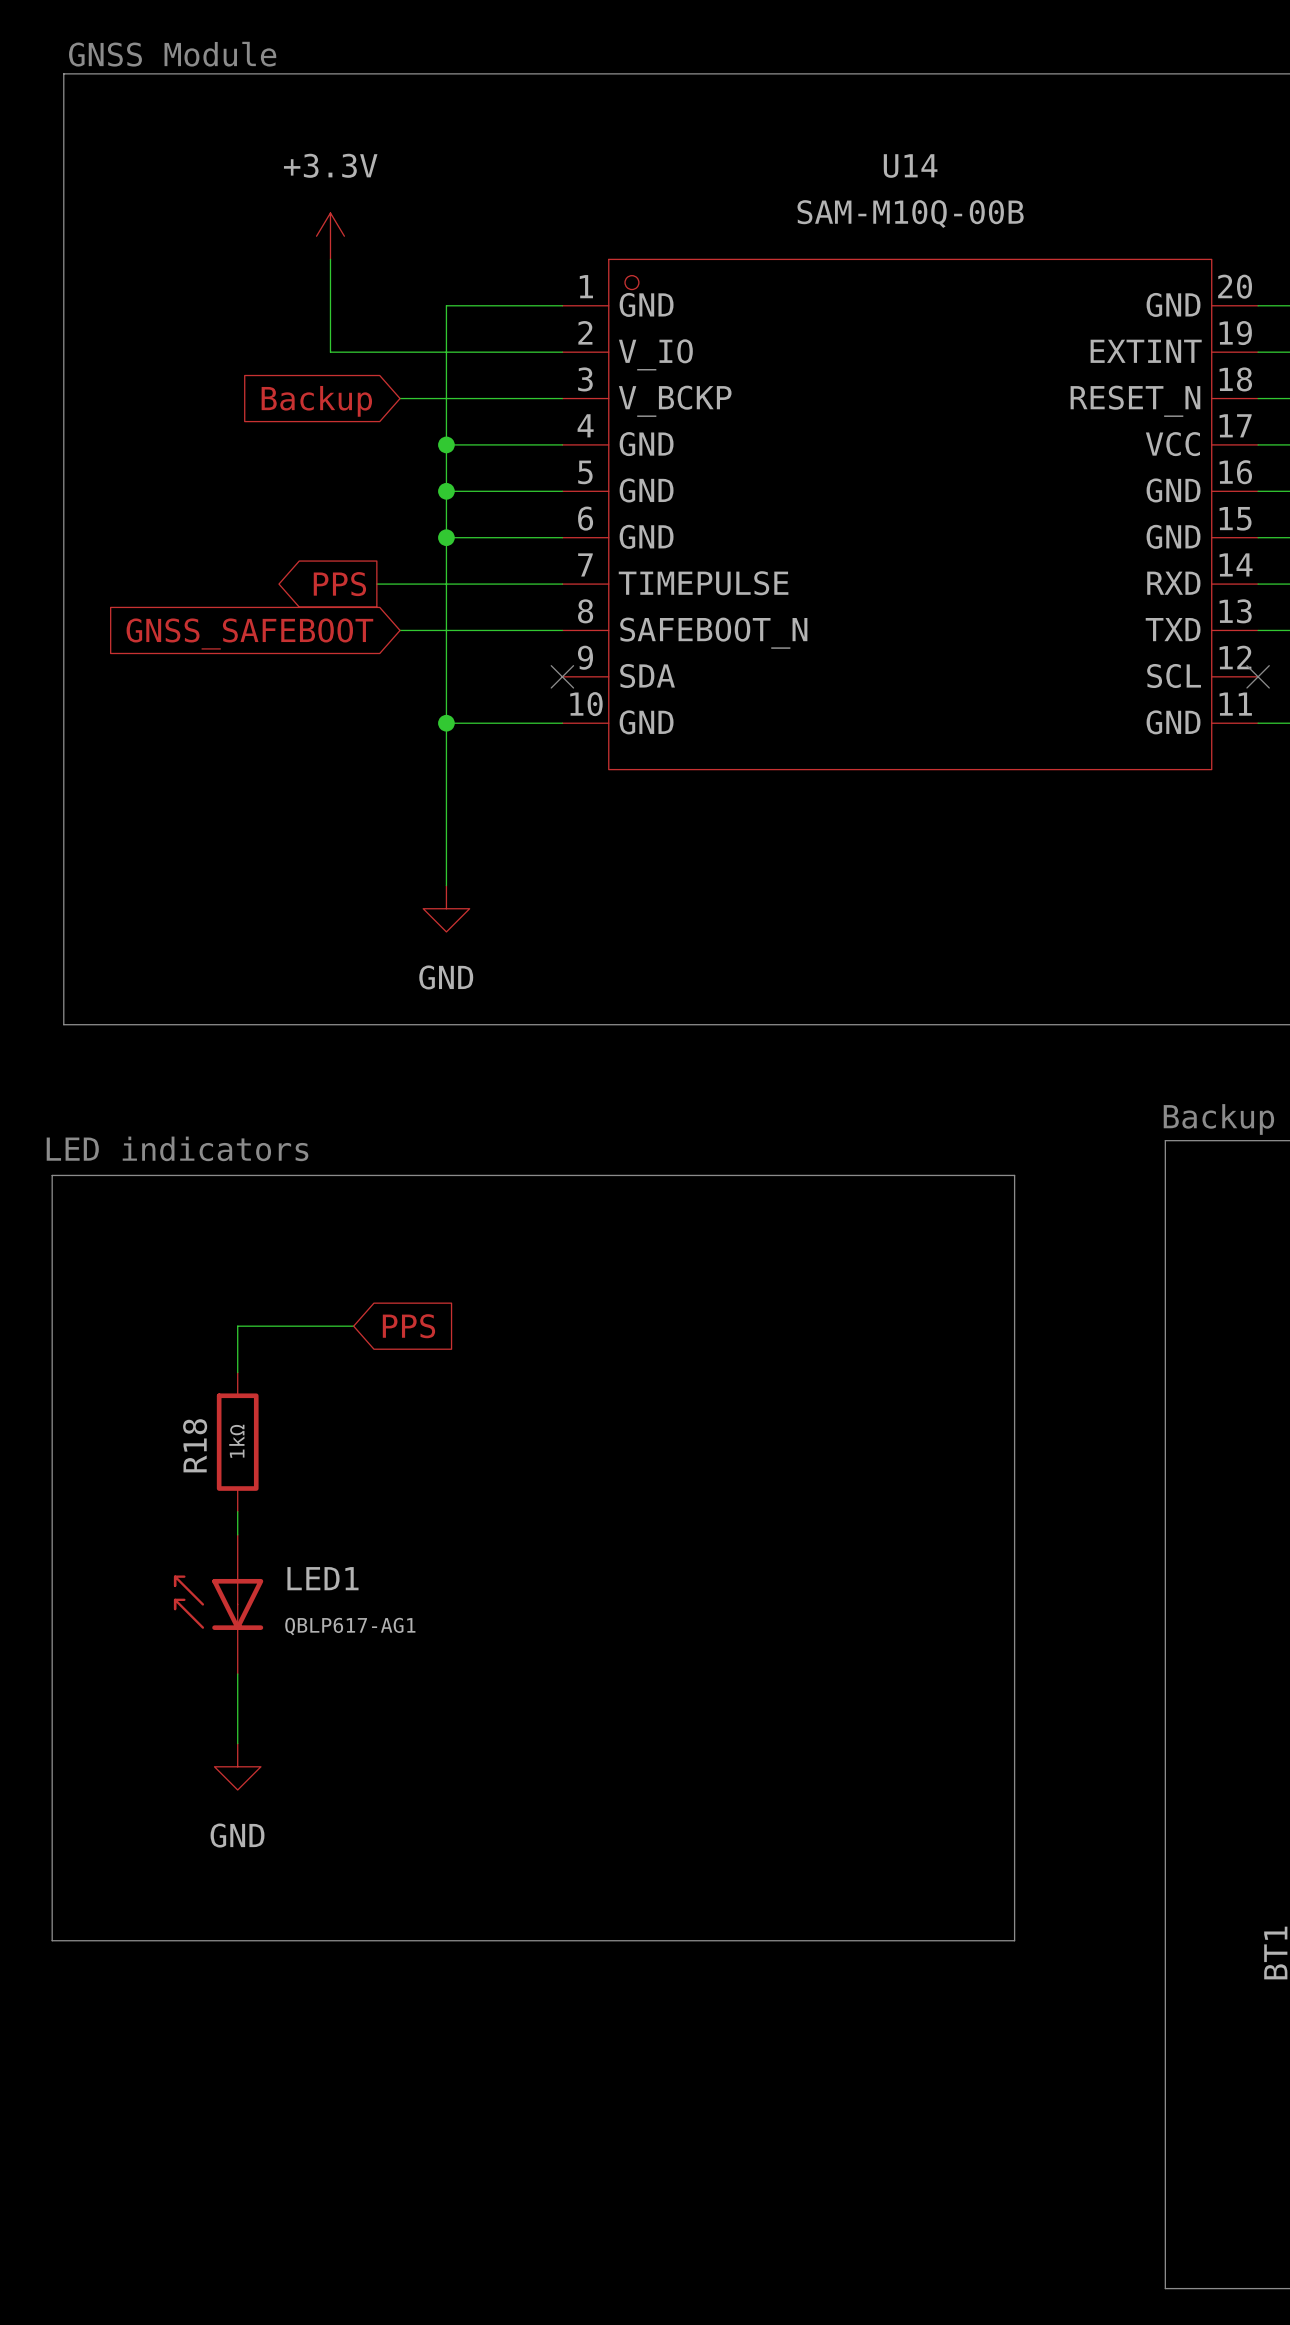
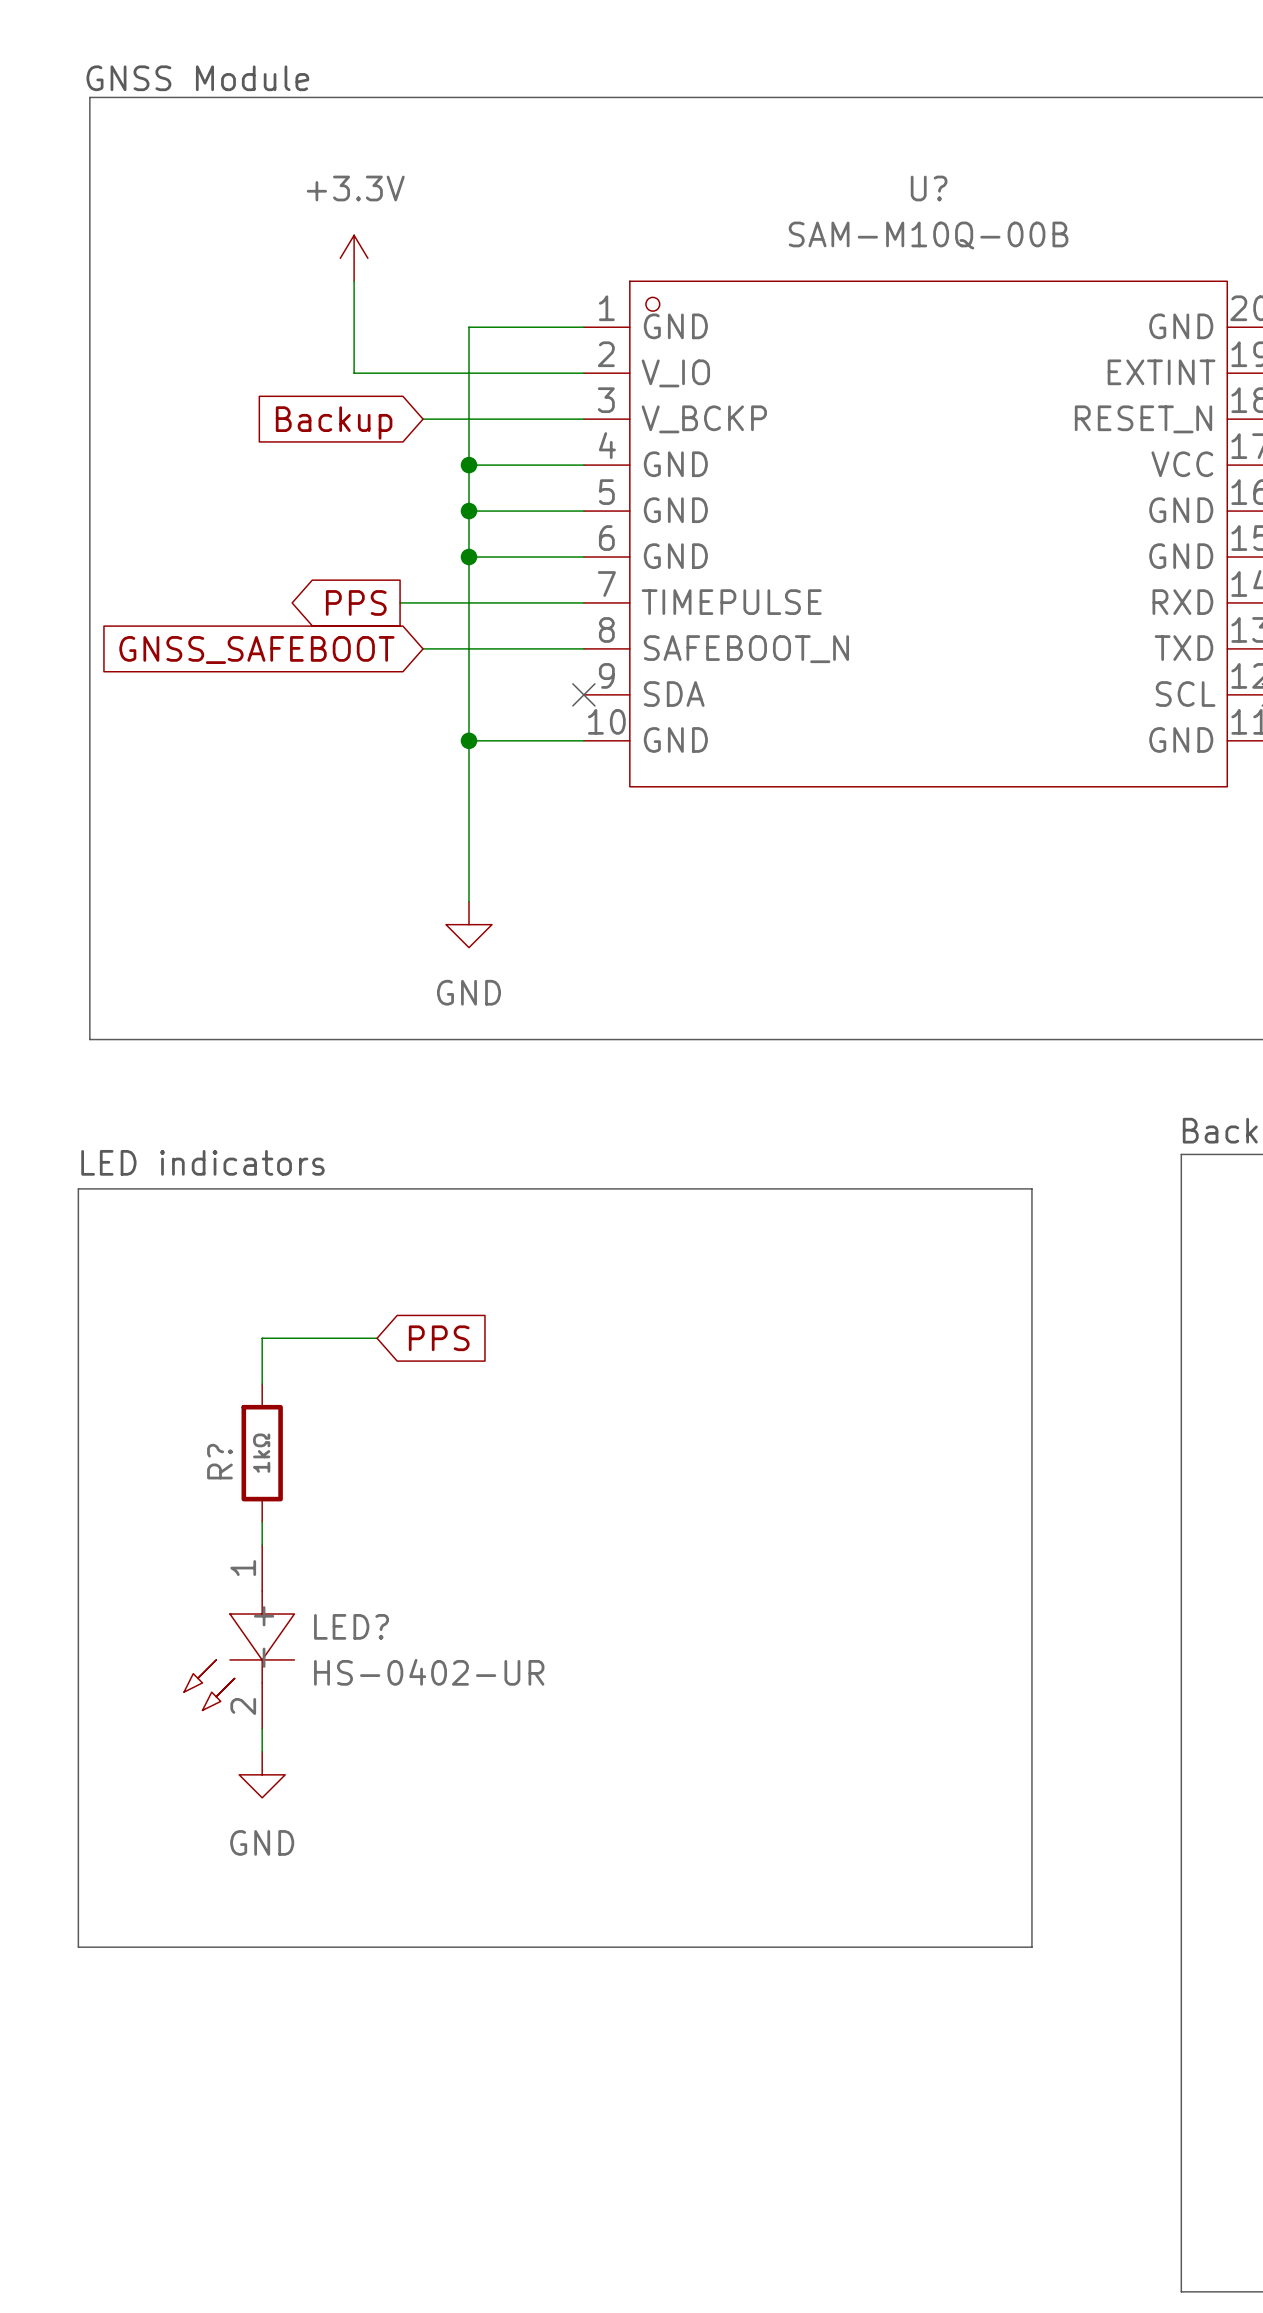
U14 name: U14 (910, 166) -> U? (929, 188)
R18 name: R18 (195, 1445) -> R? (219, 1461)
LED1: QBLP617-AG1 (218, 1604) -> none
LED?: none -> HS-0402-UR (239, 1636)

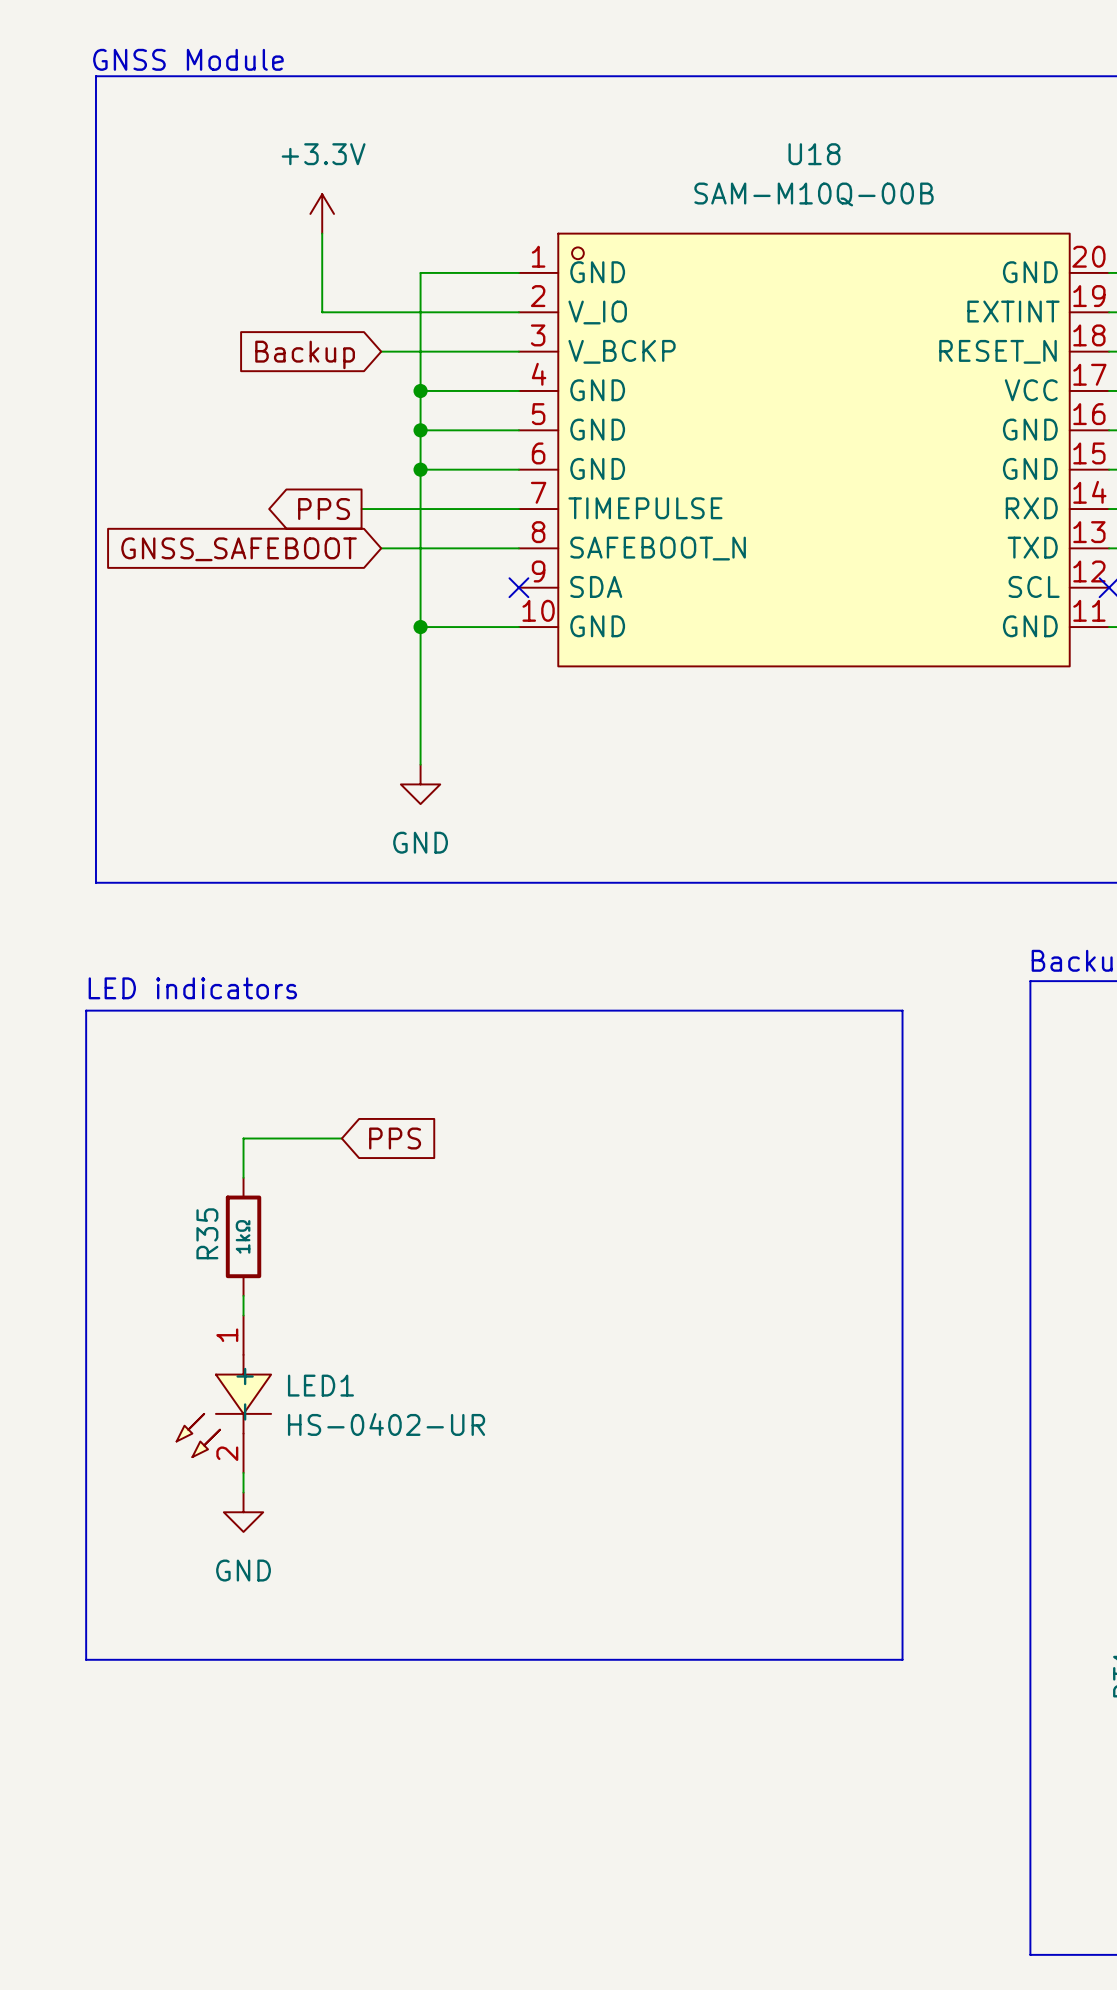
U? name: U? (929, 188) -> U18 (814, 154)
R? name: R? (219, 1461) -> R35 (207, 1233)
LED? name: LED? (351, 1626) -> LED1 (320, 1385)

